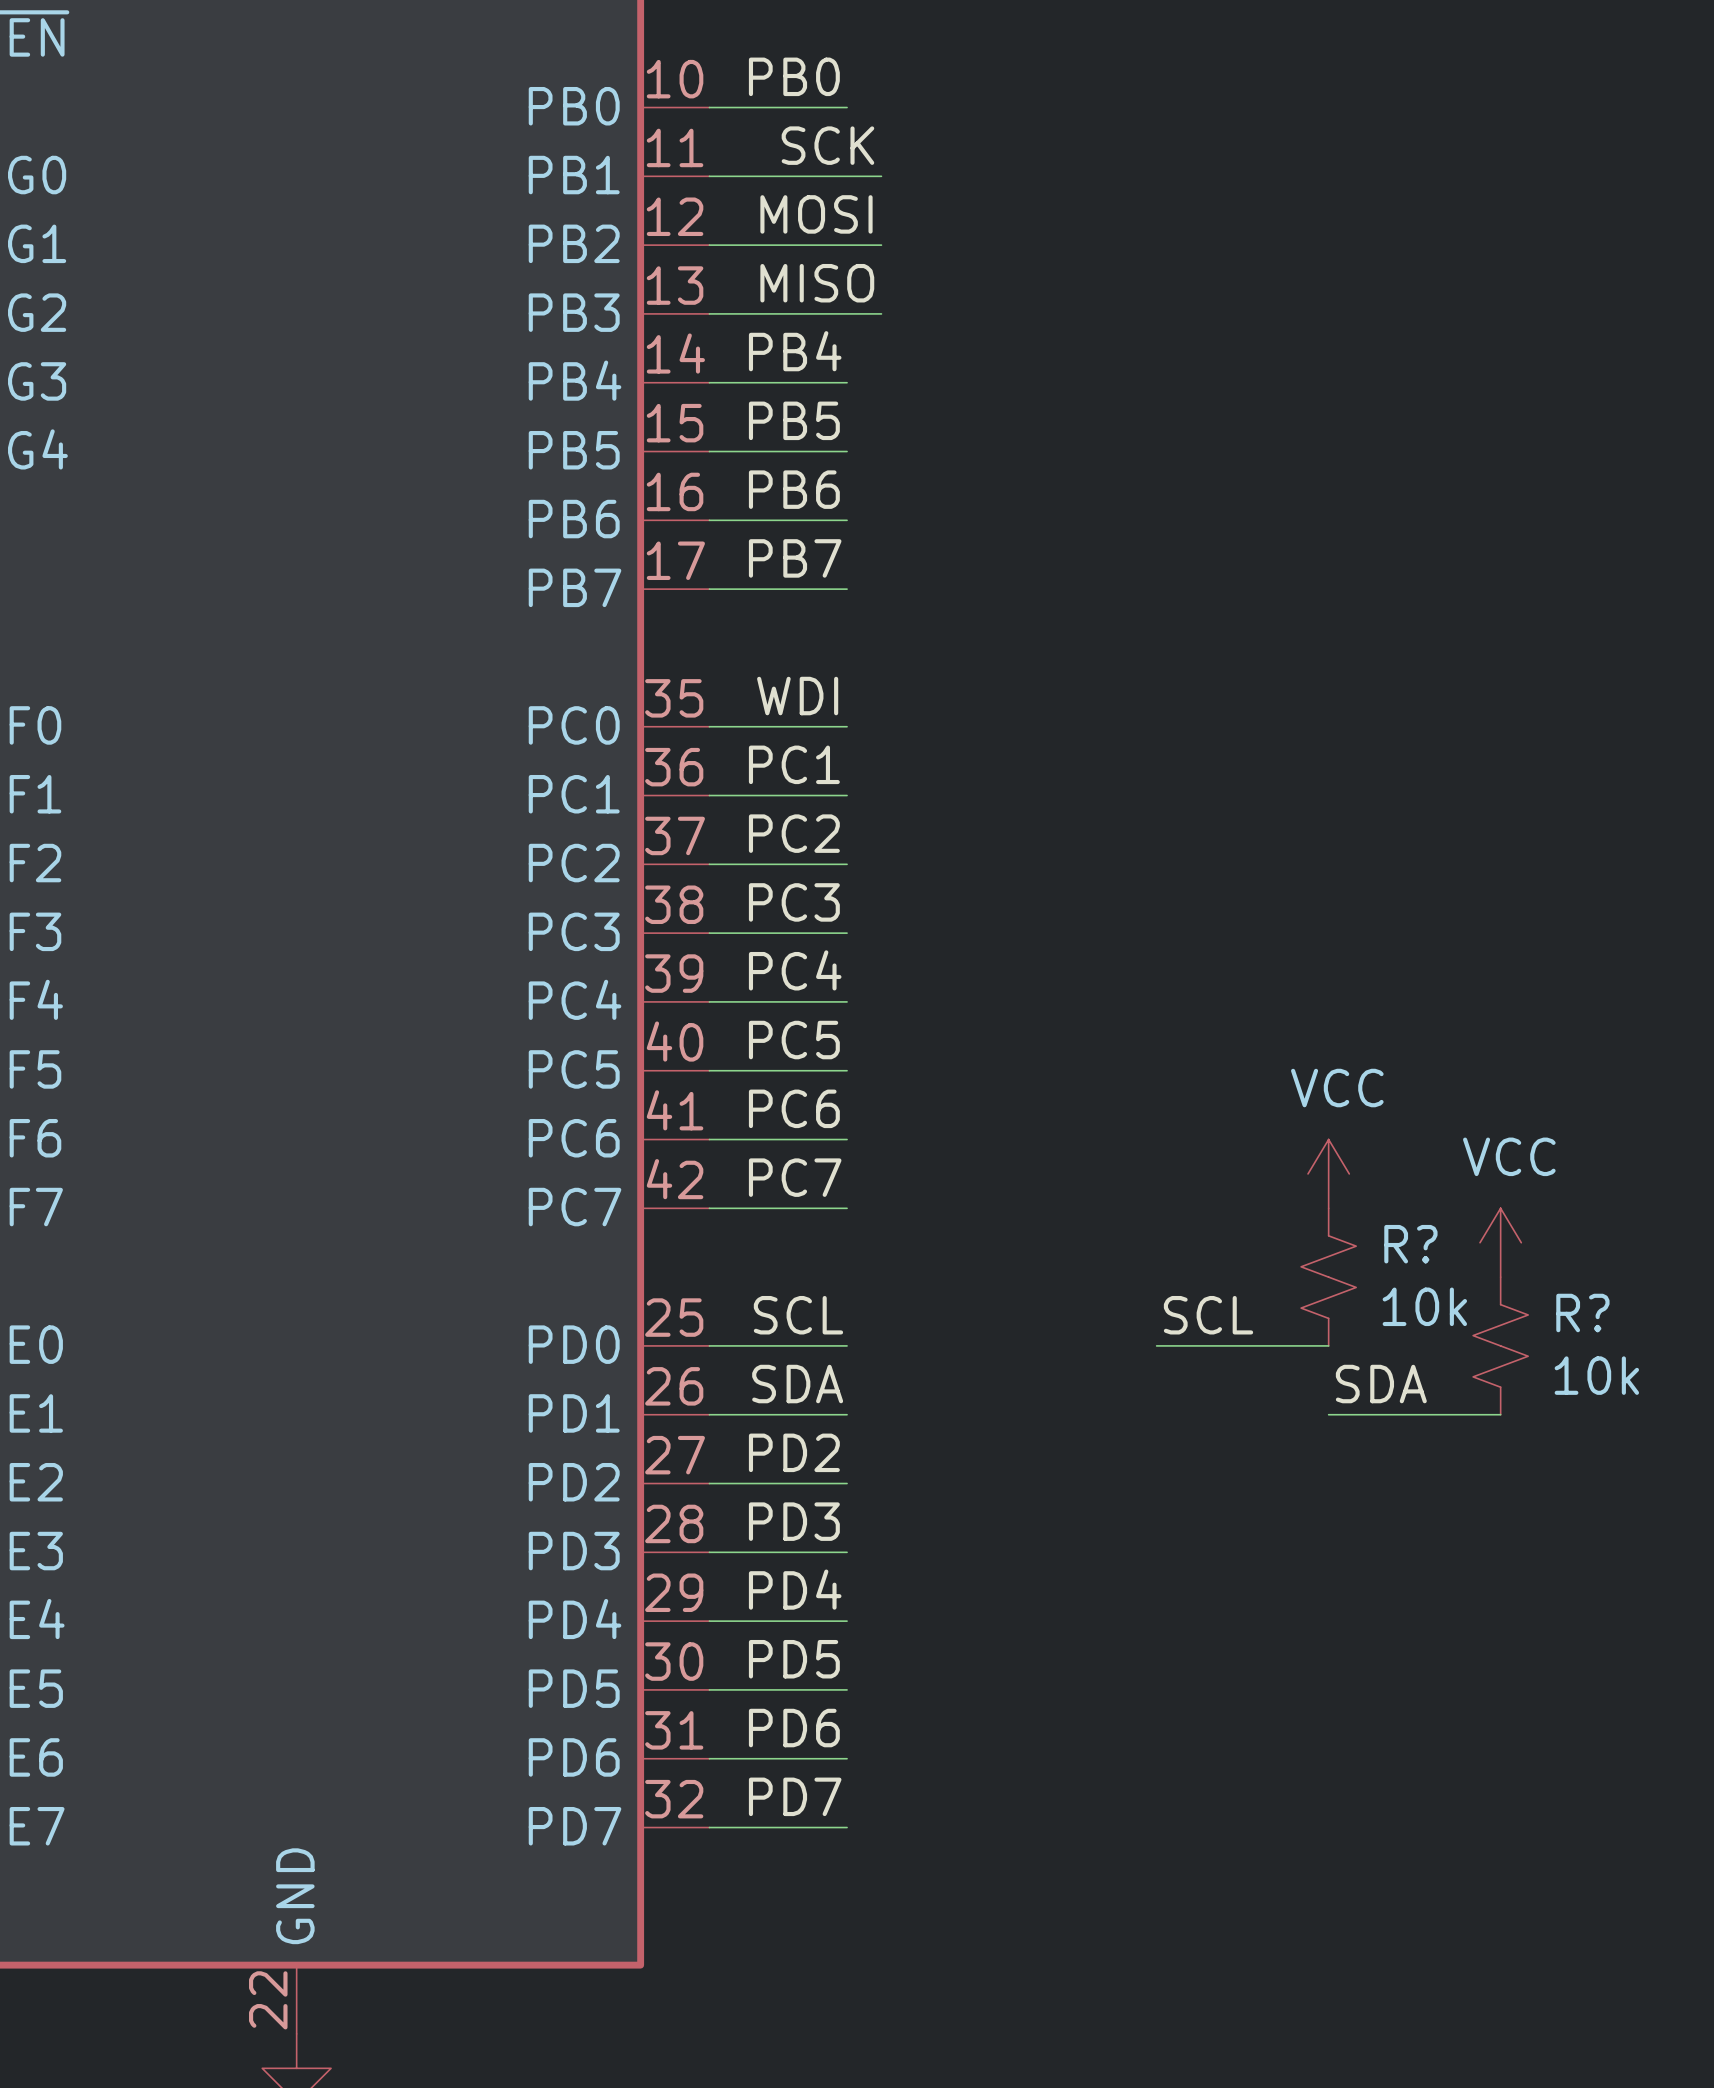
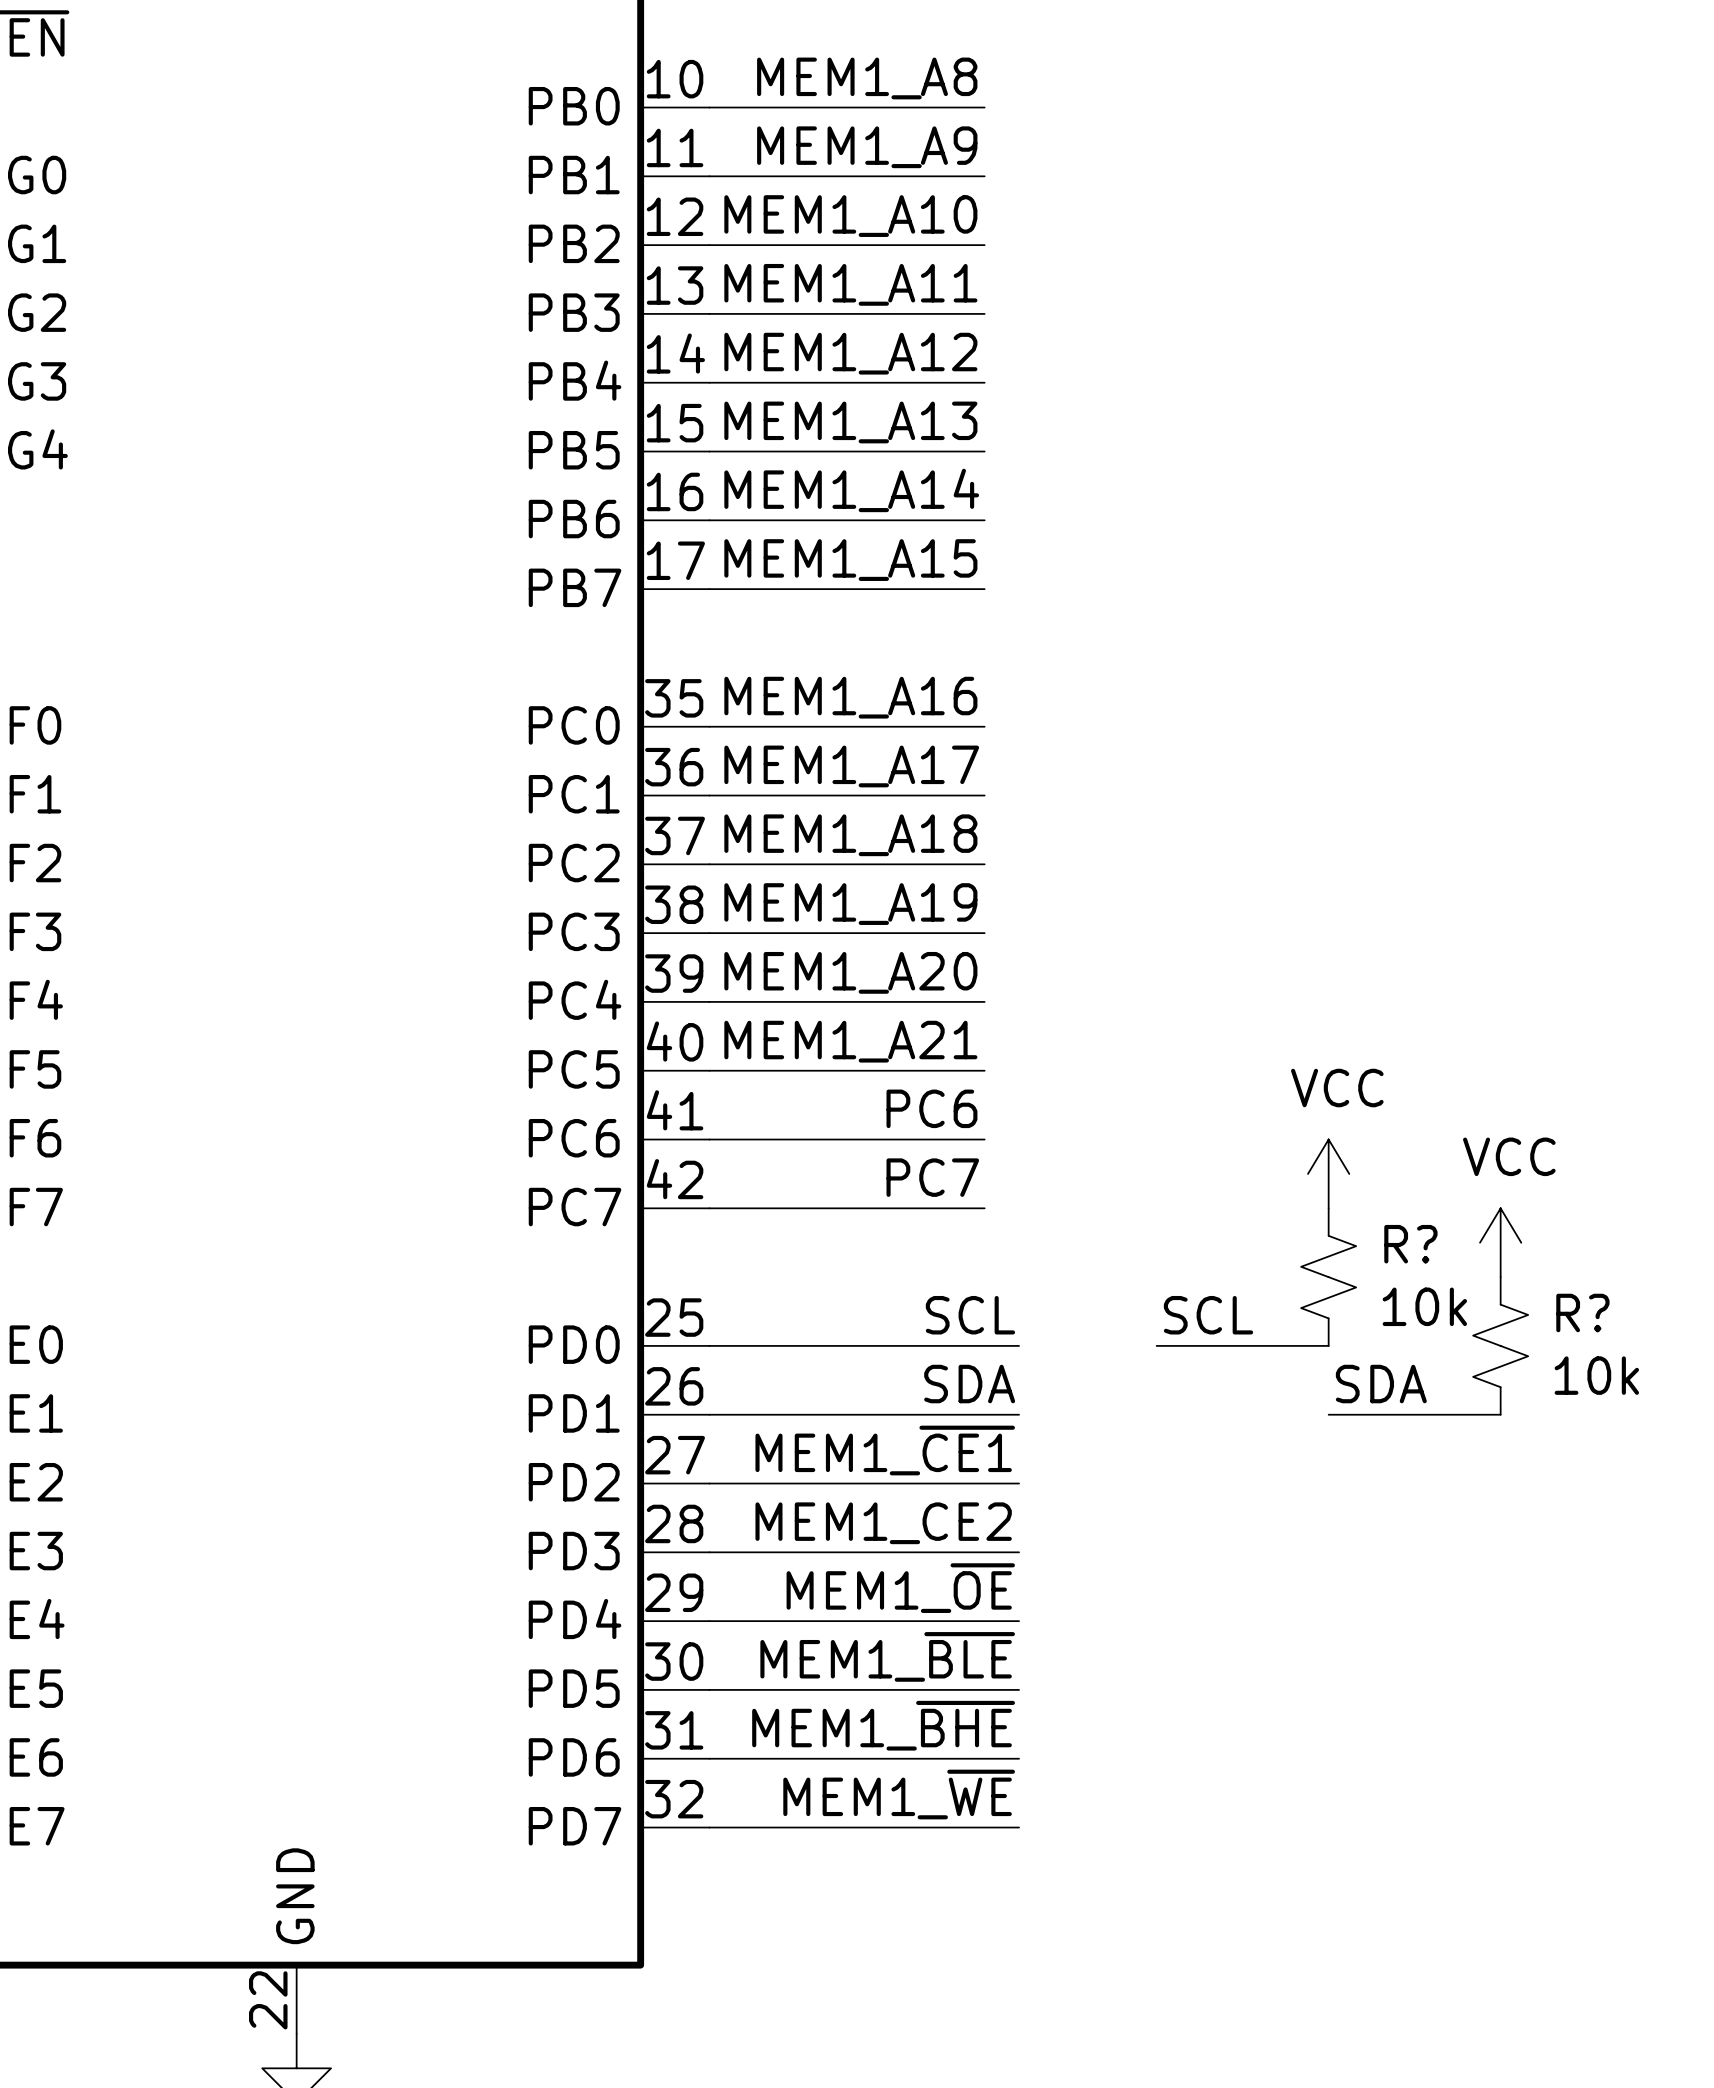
label: PB0 (794, 76) -> none
label: none -> MEM1_A8 (867, 78)
wire: none -> (847, 107) (984, 107)
label: SCK (827, 145) -> none
label: none -> MEM1_A9 (867, 147)
wire: none -> (881, 176) (984, 176)
label: MOSI (816, 214) -> none
label: none -> MEM1_A10 (850, 216)
wire: none -> (881, 245) (984, 245)
label: MISO (817, 283) -> none
label: none -> MEM1_A11 (850, 284)
wire: none -> (881, 313) (984, 313)
label: PB4 (795, 351) -> none
label: none -> MEM1_A12 (850, 353)
wire: none -> (847, 382) (984, 382)
label: PB5 (794, 420) -> none
label: none -> MEM1_A13 (850, 422)
wire: none -> (847, 451) (984, 451)
label: PB6 (794, 489) -> none
label: none -> MEM1_A14 (851, 490)
wire: none -> (847, 520) (984, 520)
label: PB7 (795, 558) -> none
label: none -> MEM1_A15 (850, 560)
wire: none -> (847, 589) (984, 589)
label: WDI (797, 696) -> none
label: none -> MEM1_A16 (850, 697)
wire: none -> (847, 726) (984, 726)
label: PC1 (794, 764) -> none
label: none -> MEM1_A17 (851, 766)
wire: none -> (847, 795) (984, 795)
label: PC2 (794, 833) -> none
label: none -> MEM1_A18 (850, 835)
wire: none -> (847, 864) (984, 864)
label: PC3 (794, 902) -> none
label: none -> MEM1_A19 (850, 904)
wire: none -> (847, 933) (984, 933)
label: PC4 (795, 970) -> none
label: none -> MEM1_A20 (850, 972)
wire: none -> (847, 1001) (984, 1001)
label: PC5 (794, 1040) -> none
label: none -> MEM1_A21 (850, 1041)
wire: none -> (847, 1070) (984, 1070)
label position: PC6 (794, 1108) -> PC6 (931, 1108)
wire: none -> (847, 1139) (984, 1139)
label position: PC7 (795, 1177) -> PC7 (932, 1177)
wire: none -> (847, 1208) (984, 1208)
label position: SCL (798, 1315) -> SCL (970, 1315)
wire: none -> (847, 1345) (1019, 1345)
label position: SDA (797, 1384) -> SDA (969, 1384)
wire: none -> (847, 1414) (1019, 1414)
label: none -> MEM1_~{CE1} (885, 1450)
label: PD2 (794, 1452) -> none
wire: none -> (847, 1483) (1019, 1483)
label: PD3 (794, 1521) -> none
label: none -> MEM1_CE2 (883, 1523)
wire: none -> (847, 1552) (1019, 1552)
label: none -> MEM1_~{OE} (900, 1588)
label: PD4 (795, 1589) -> none
wire: none -> (847, 1621) (1019, 1621)
label: none -> MEM1_~{BLE} (887, 1656)
label: PD5 (794, 1659) -> none
wire: none -> (847, 1689) (1019, 1689)
label: none -> MEM1_~{BHE} (883, 1725)
label: PD6 (794, 1728) -> none
wire: none -> (847, 1758) (1019, 1758)
label: none -> MEM1_~{WE} (899, 1794)
label: PD7 (795, 1796) -> none
wire: none -> (847, 1827) (1019, 1827)

